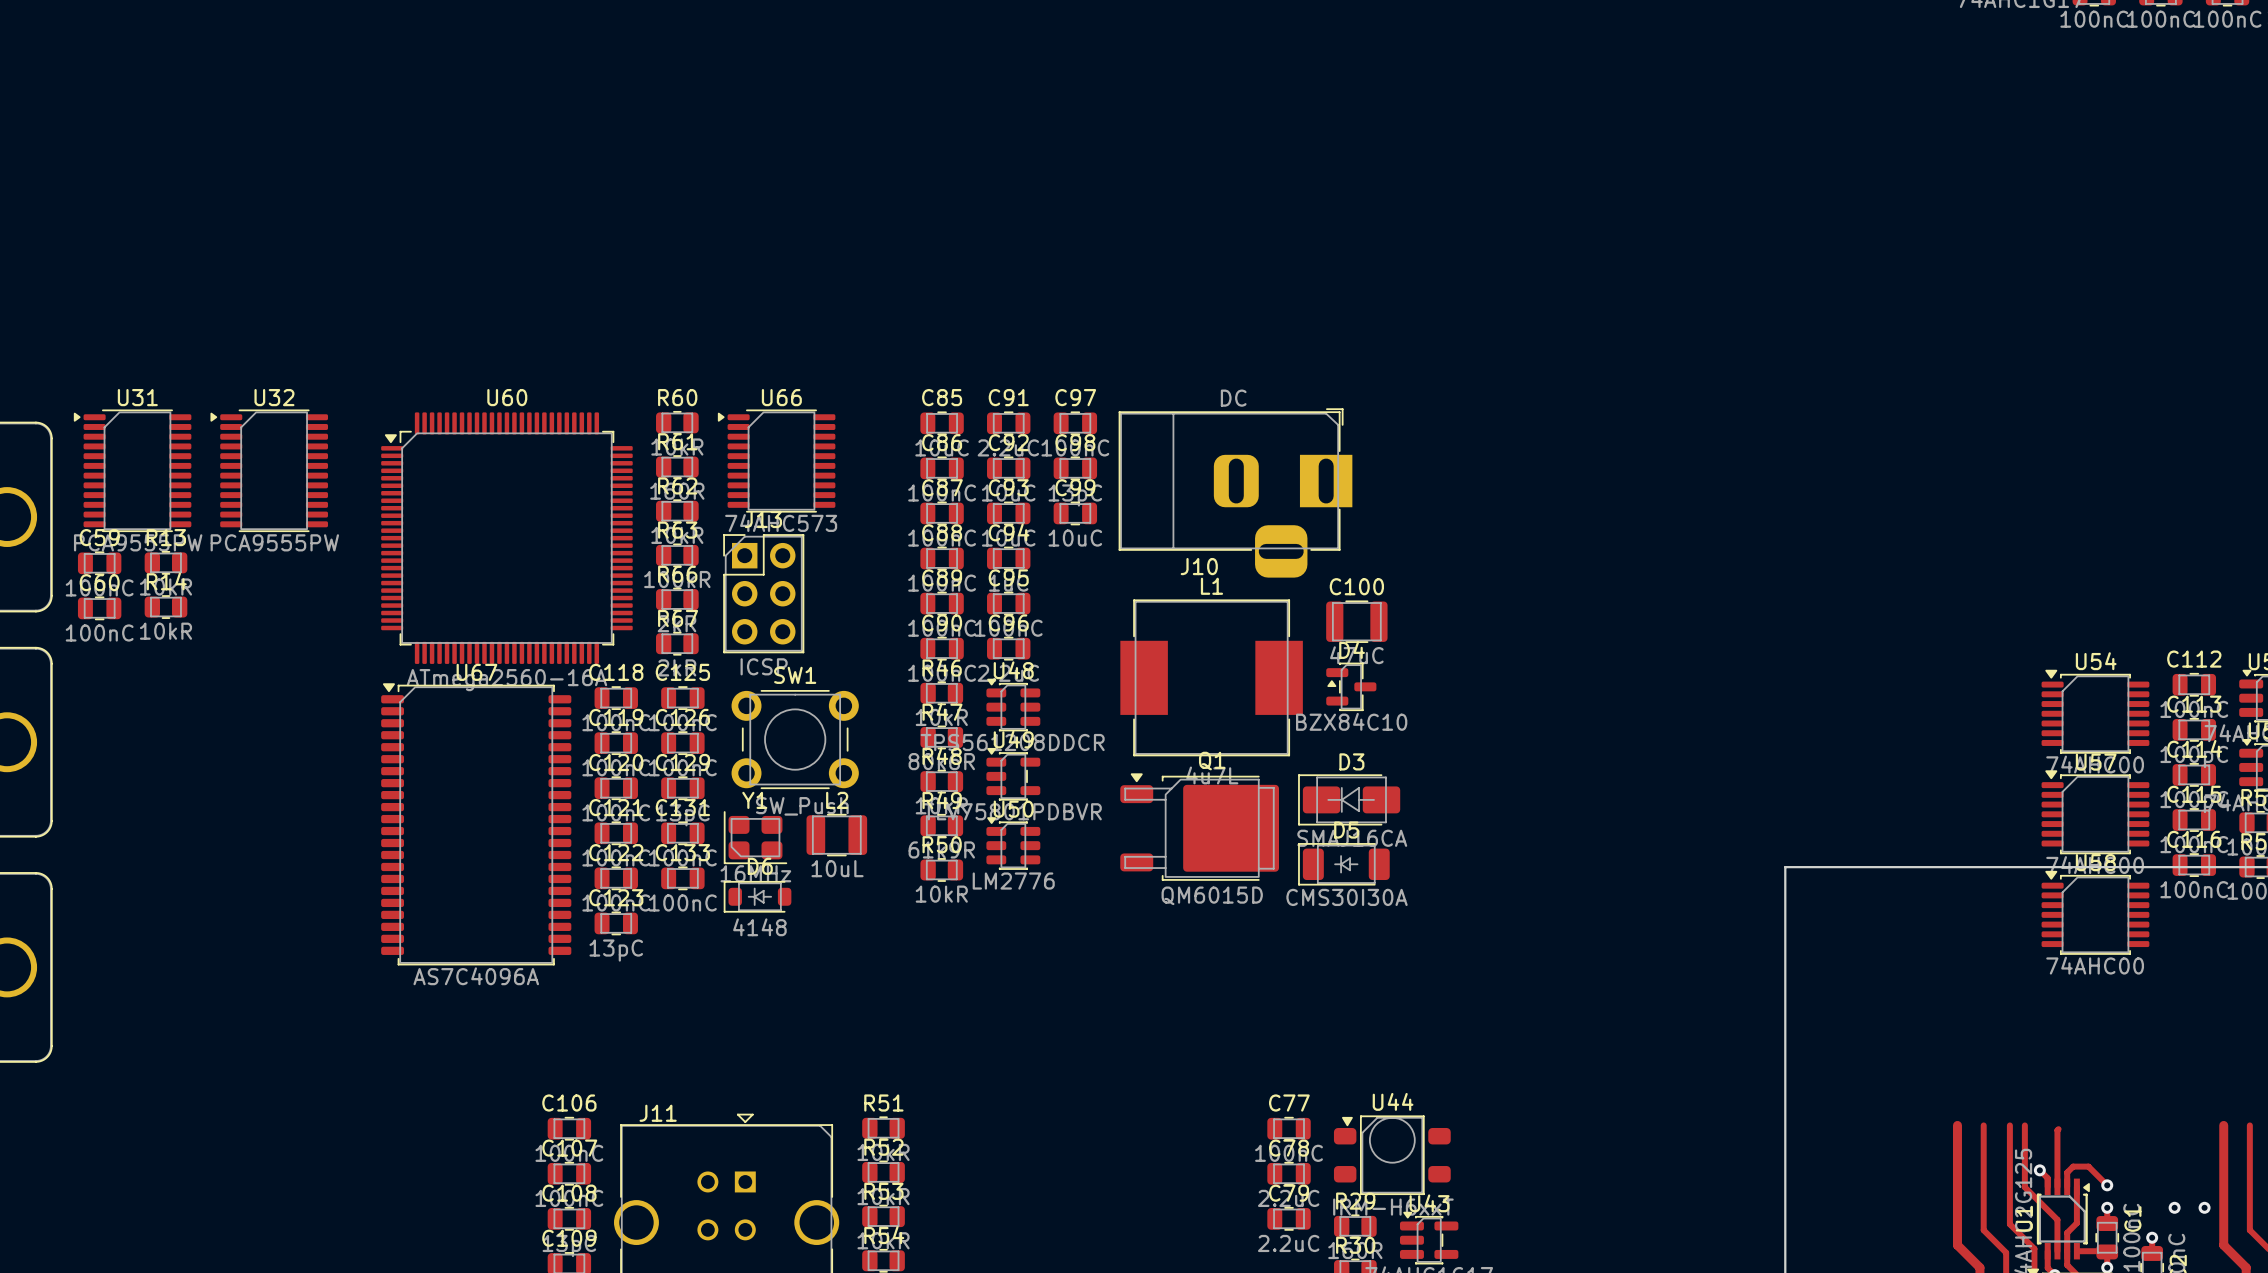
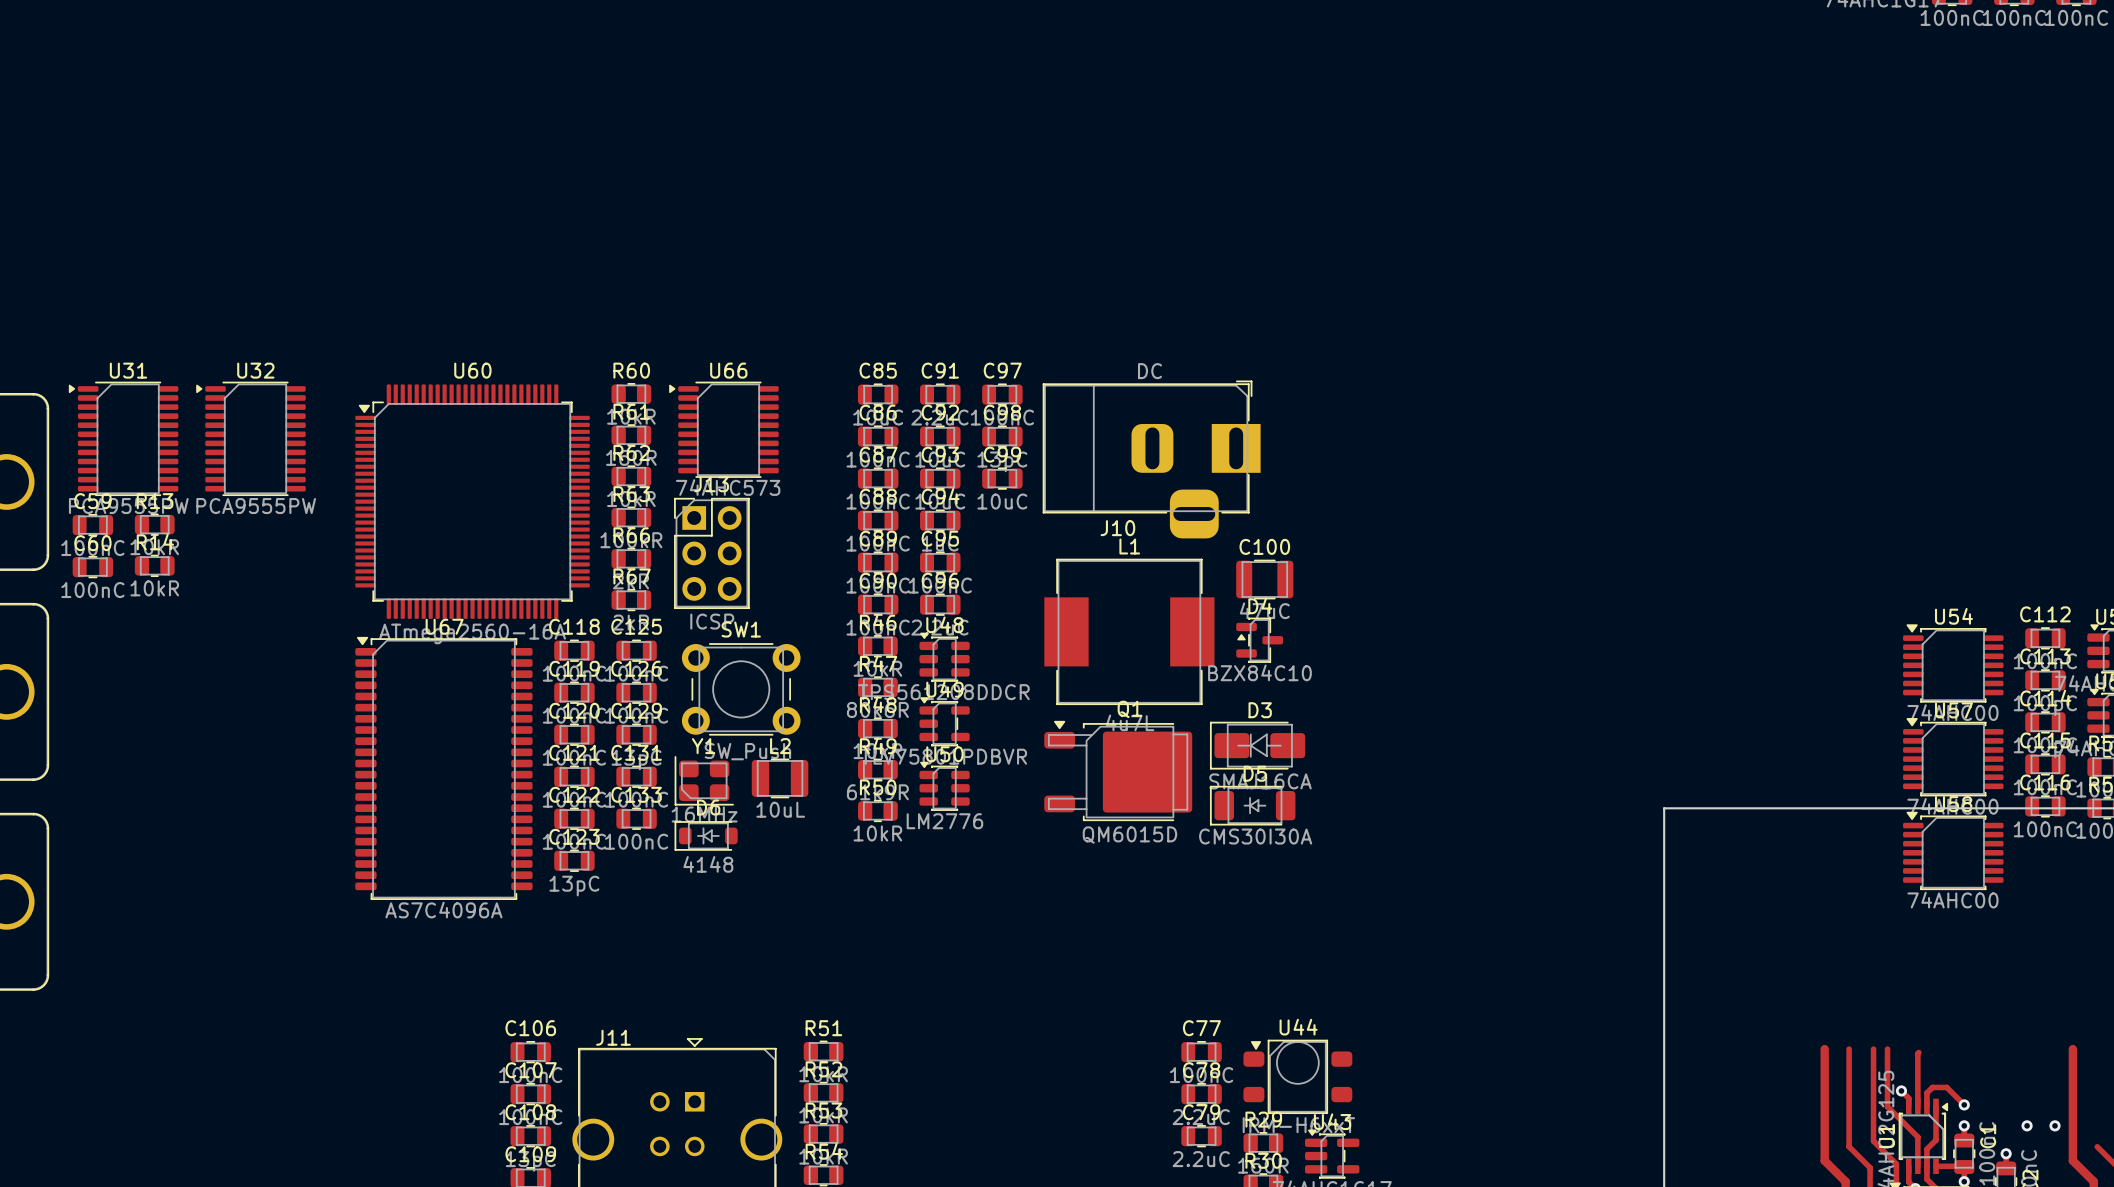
track: (2249, 1125) (2249, 1230) -> none

